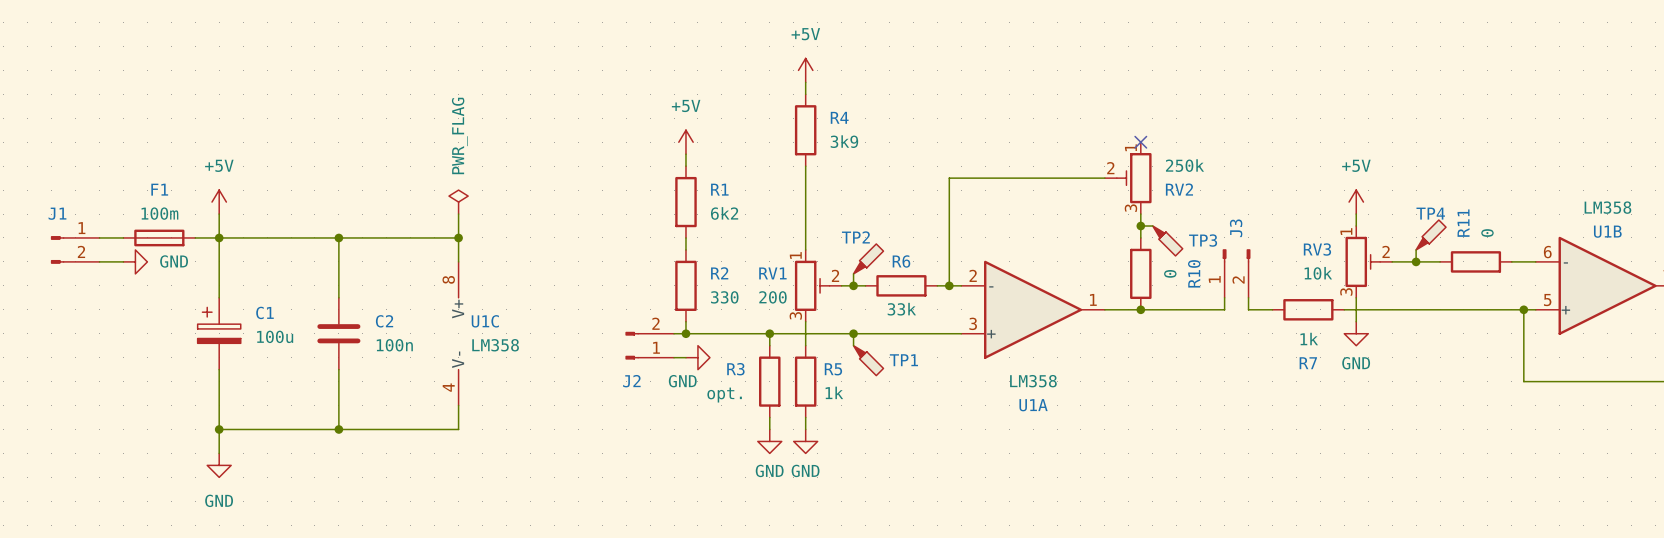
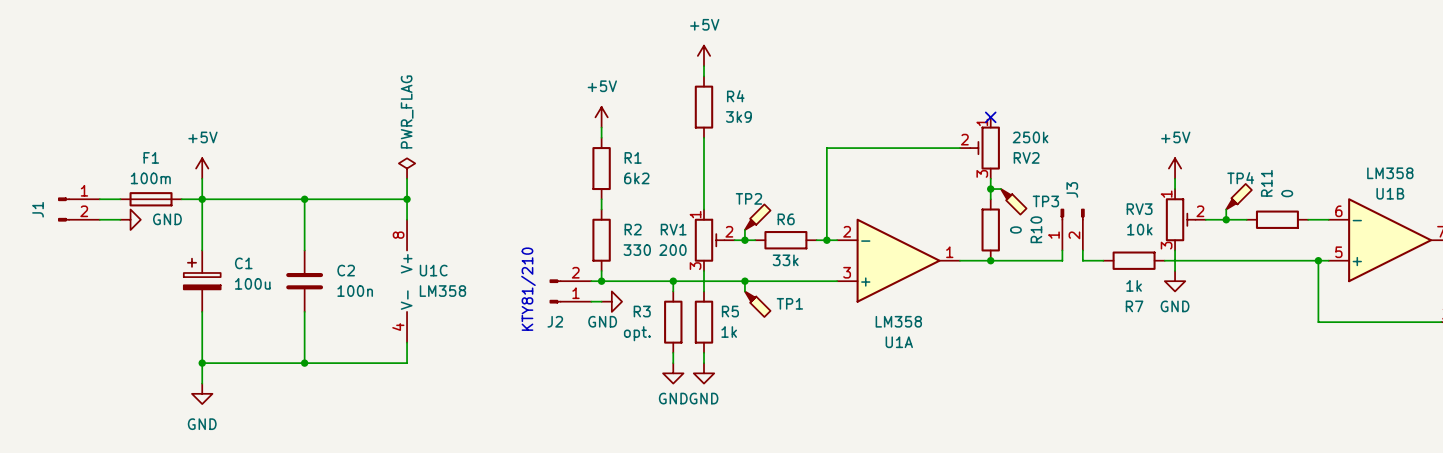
J1 name rotation: 0° (57, 213) -> 90° counterclockwise (38, 209)
J1 name position: J1 (57, 213) -> J1 (38, 209)
text: none -> KTY81/210 (528, 289)

